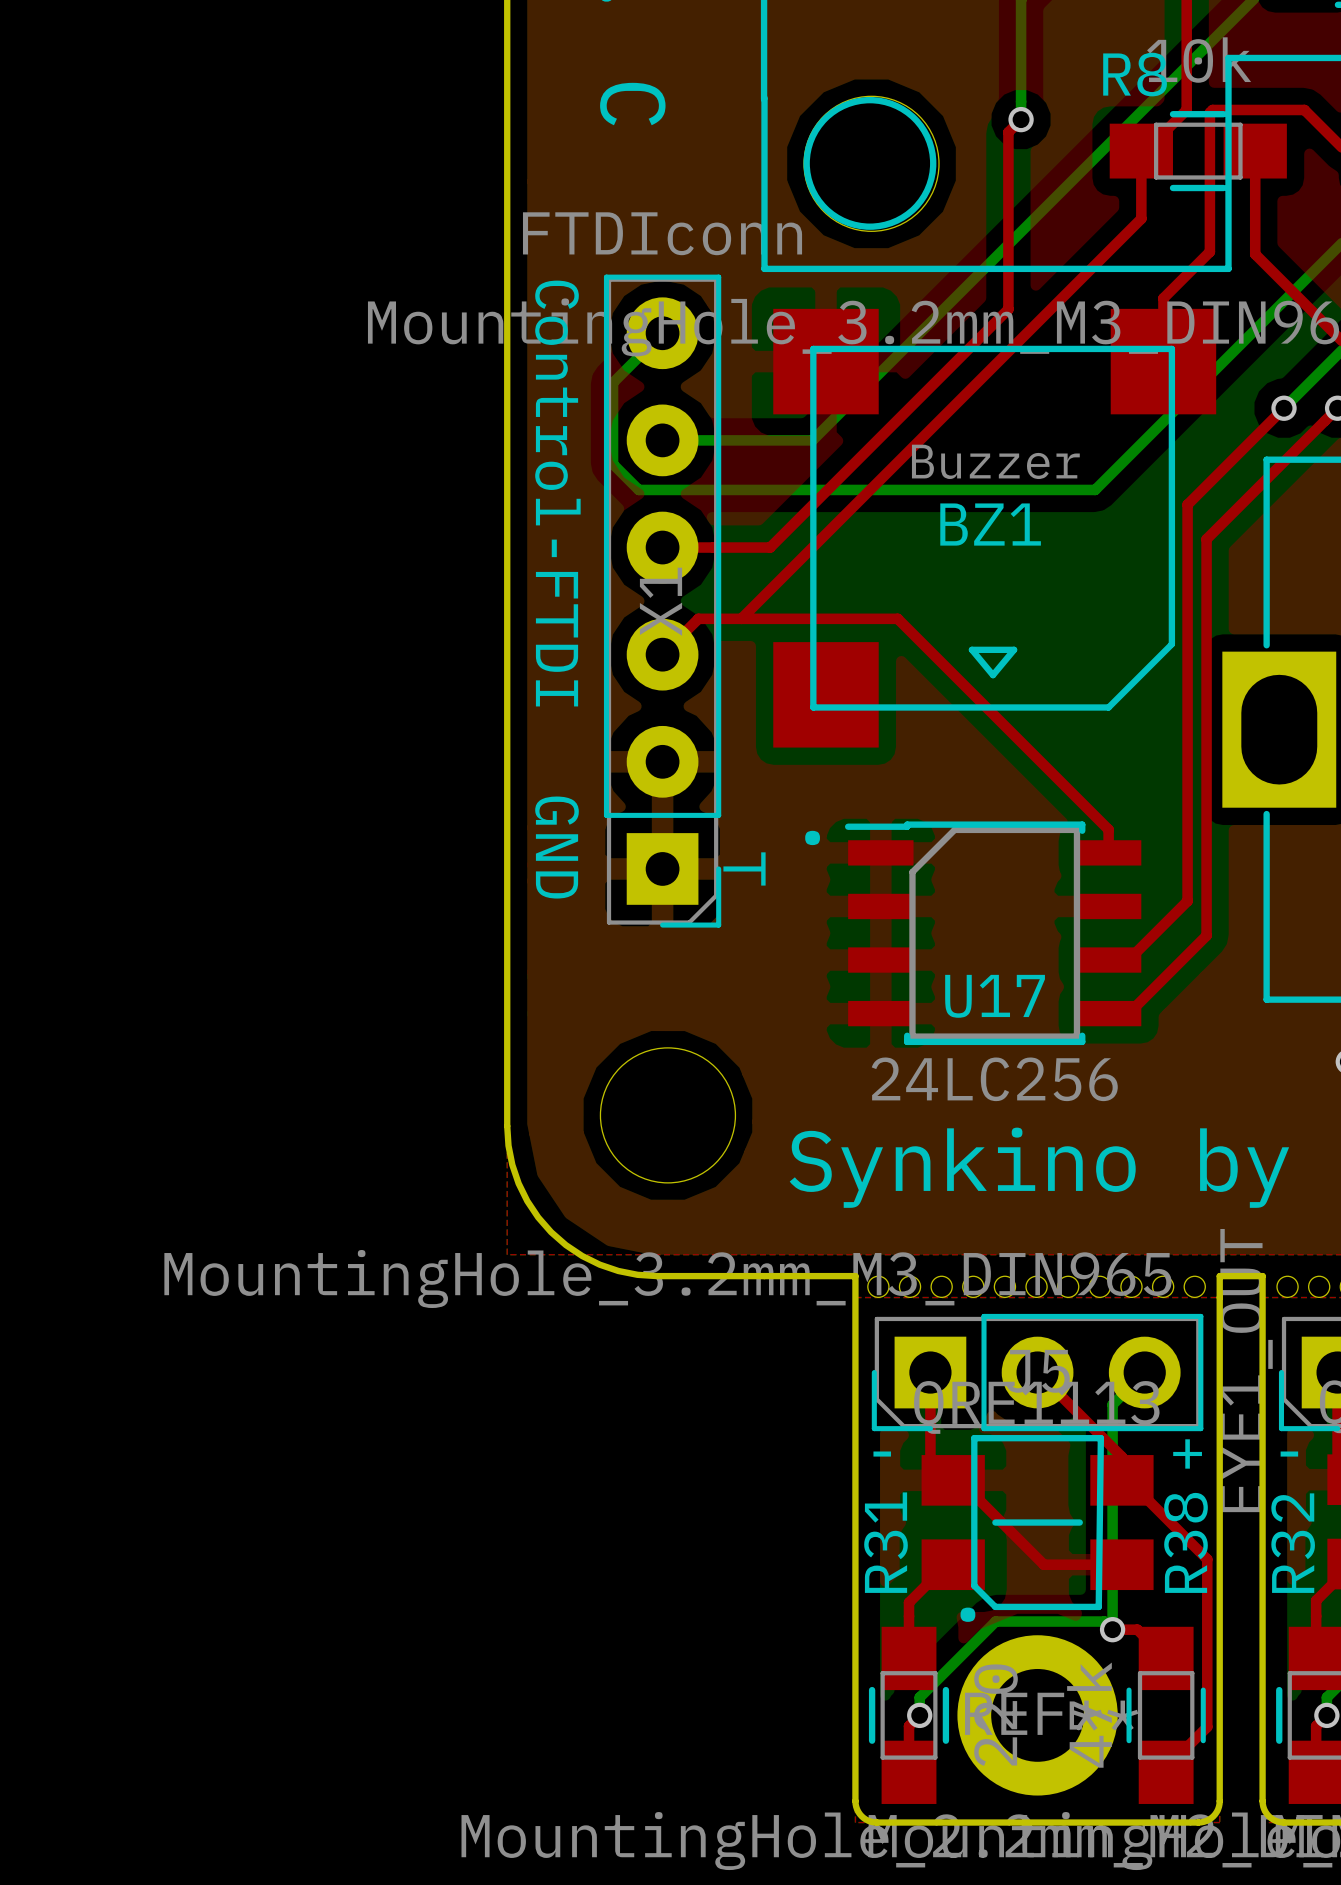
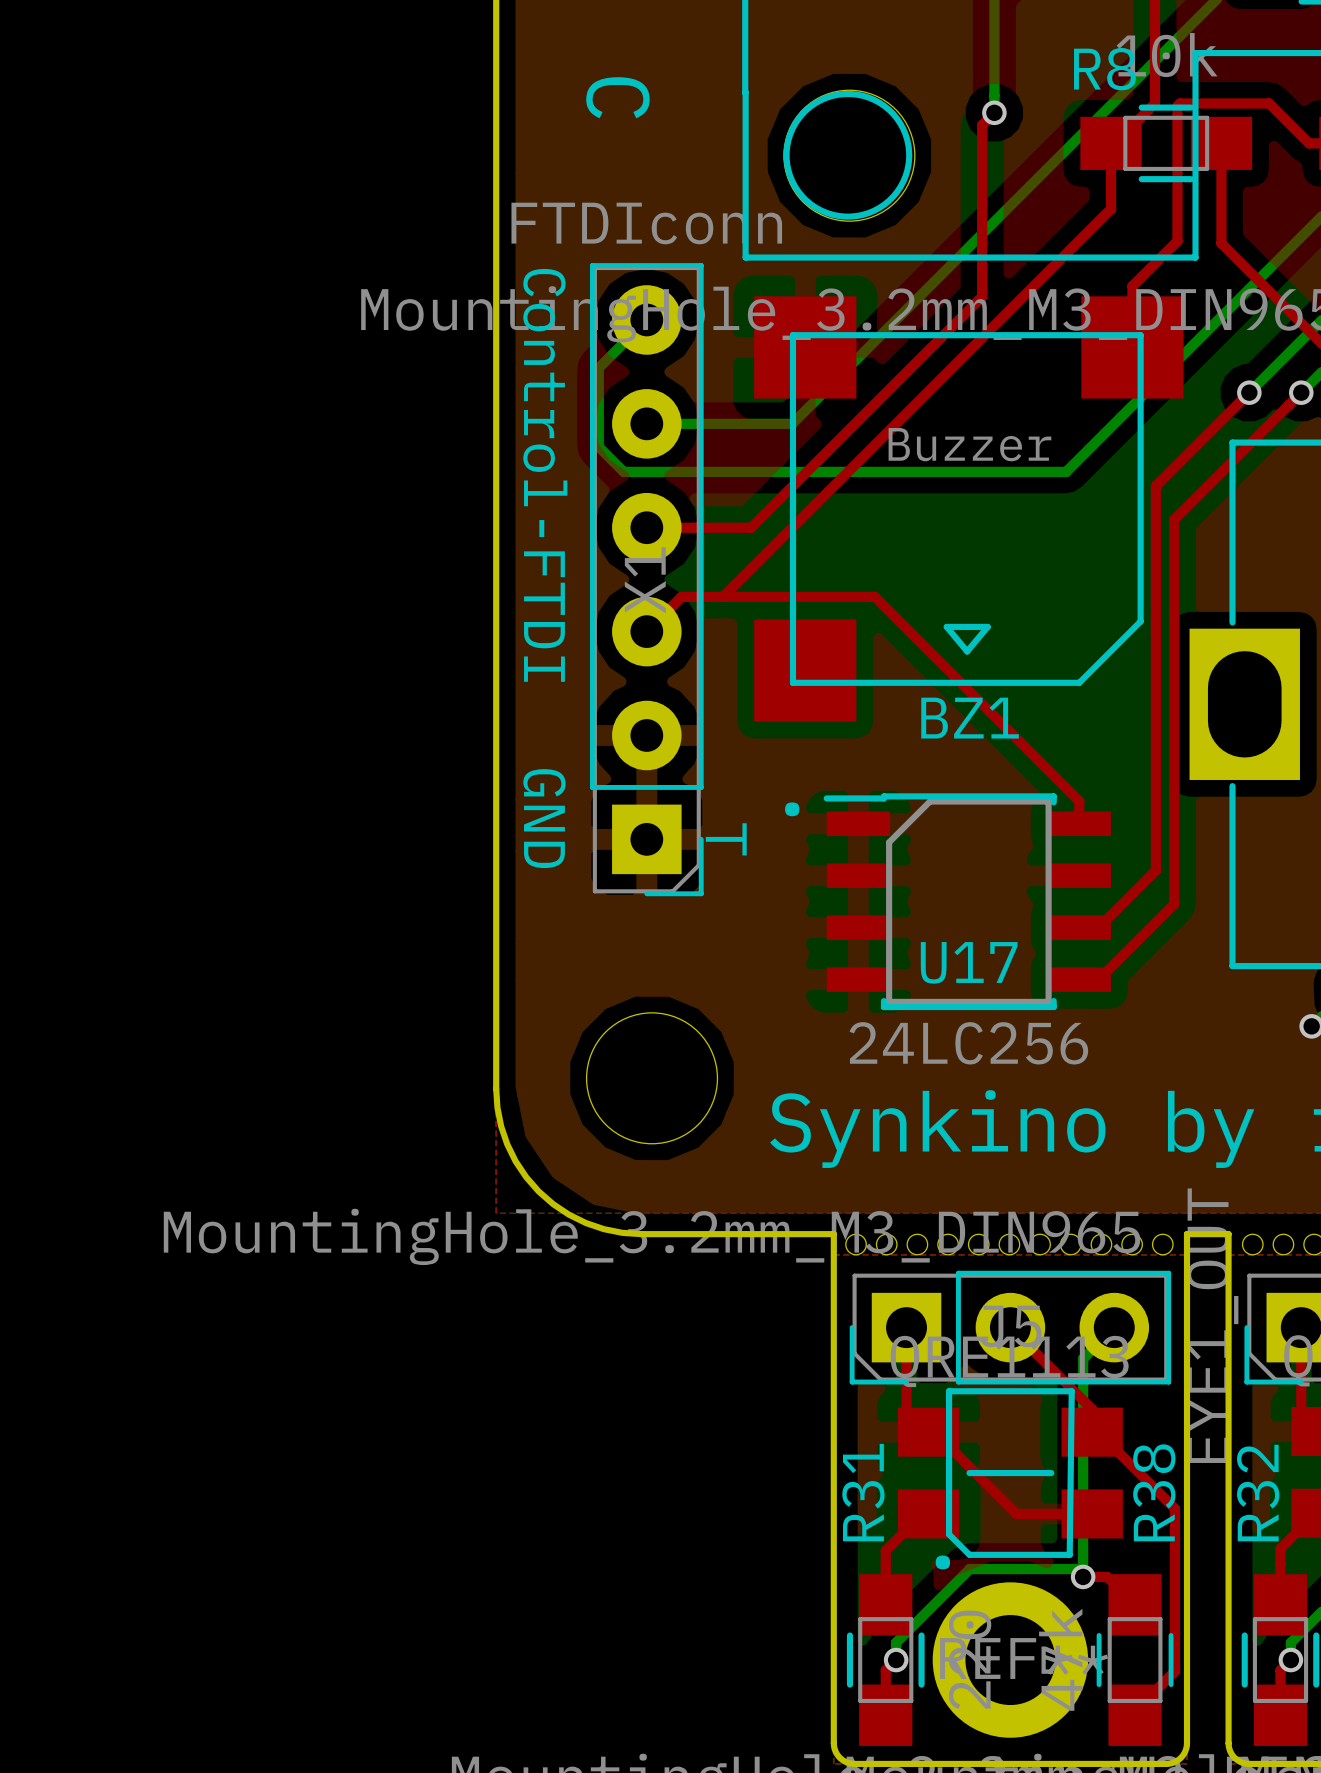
BZ1 name position: BZ1 (990, 524) -> BZ1 (970, 718)
text: + (1187, 1453) -> none
text: - (882, 1454) -> none
text: - (1289, 1454) -> none

